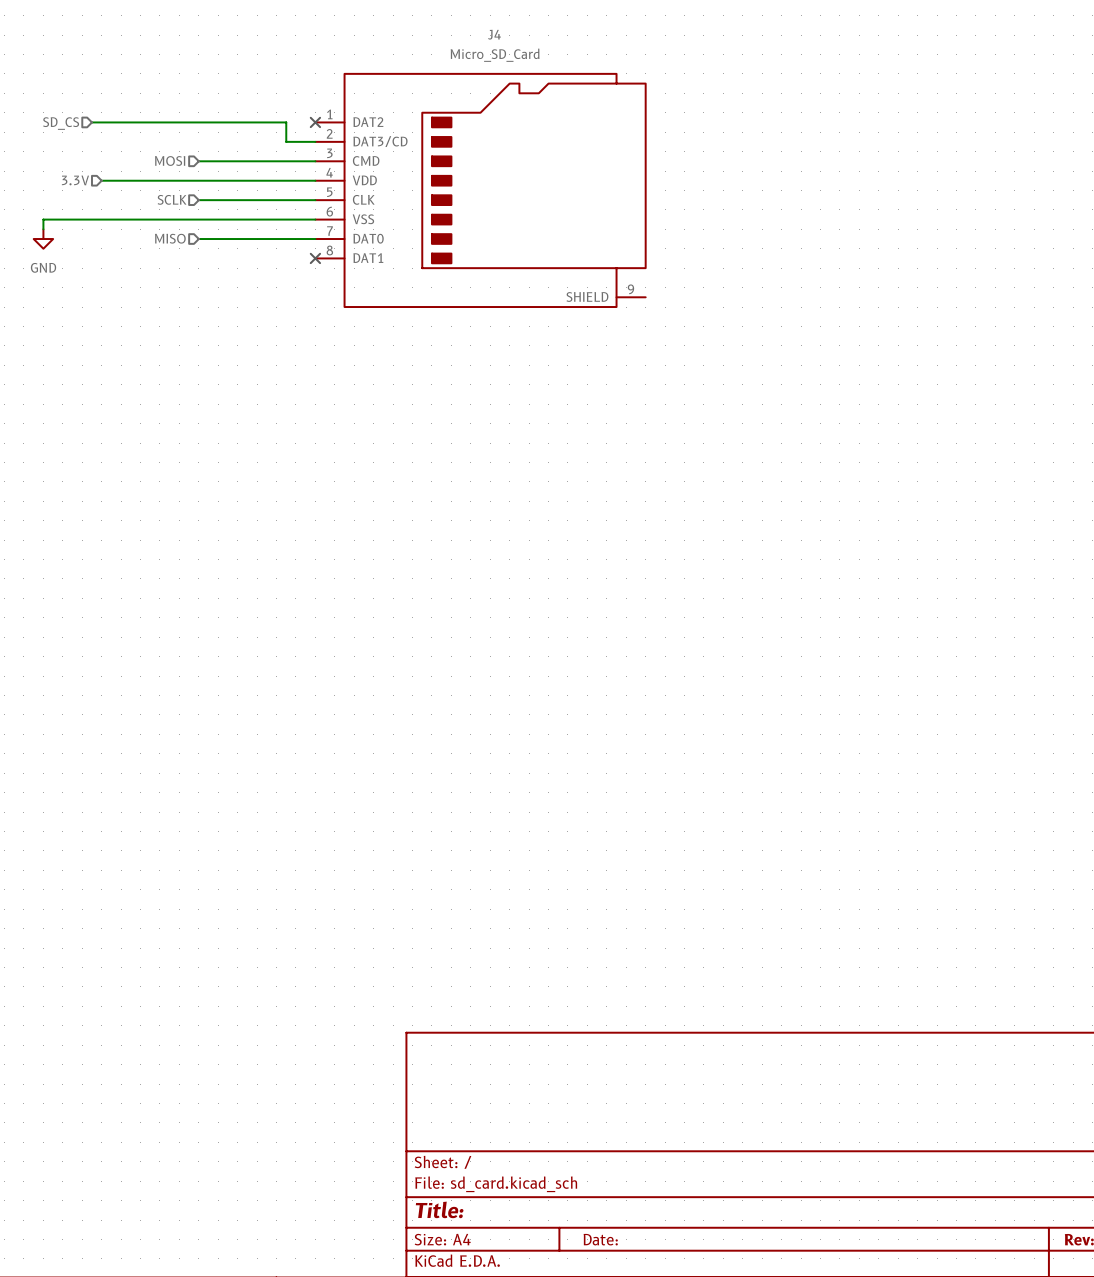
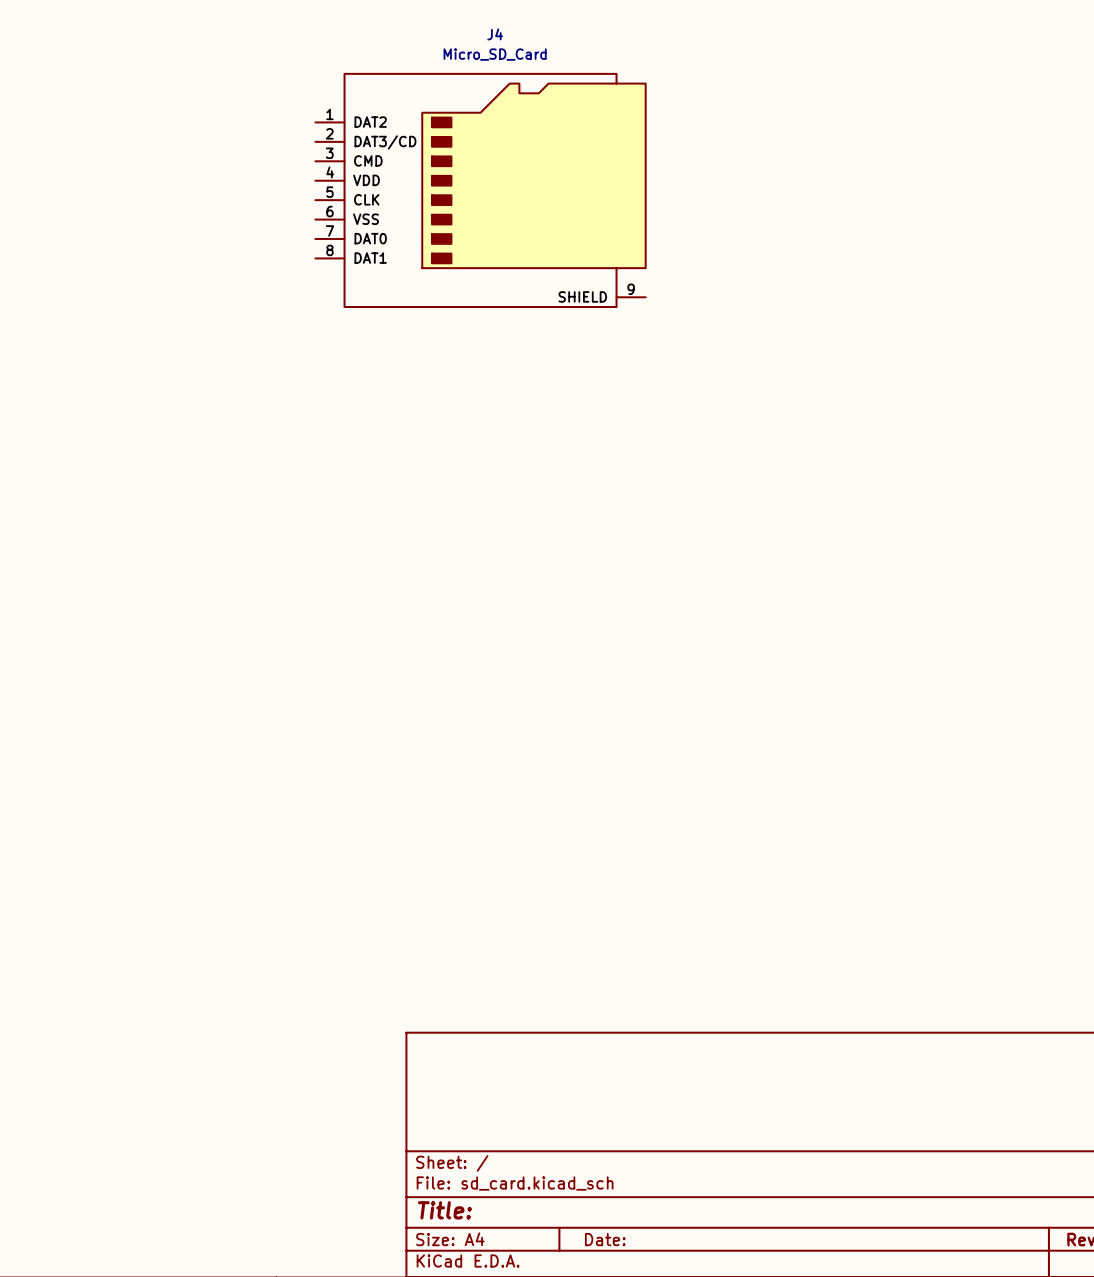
wire: (91, 122) (286, 122) (286, 141) (315, 141) -> none
no-connect mark: (315, 122) -> none
hierarchical label: SD_CS (61, 123) -> none
hierarchical label: MOSI (170, 160) -> none
wire: (198, 161) (315, 161) -> none
hierarchical label: 3.3V (75, 180) -> none
wire: (101, 180) (315, 180) -> none
hierarchical label: SCLK (172, 199) -> none
wire: (198, 200) (315, 200) -> none
wire: (315, 219) (43, 219) (43, 229) -> none
hierarchical label: MISO (170, 238) -> none
power symbol: GND (43, 239) -> none
wire: (198, 239) (315, 239) -> none
no-connect mark: (315, 258) -> none

